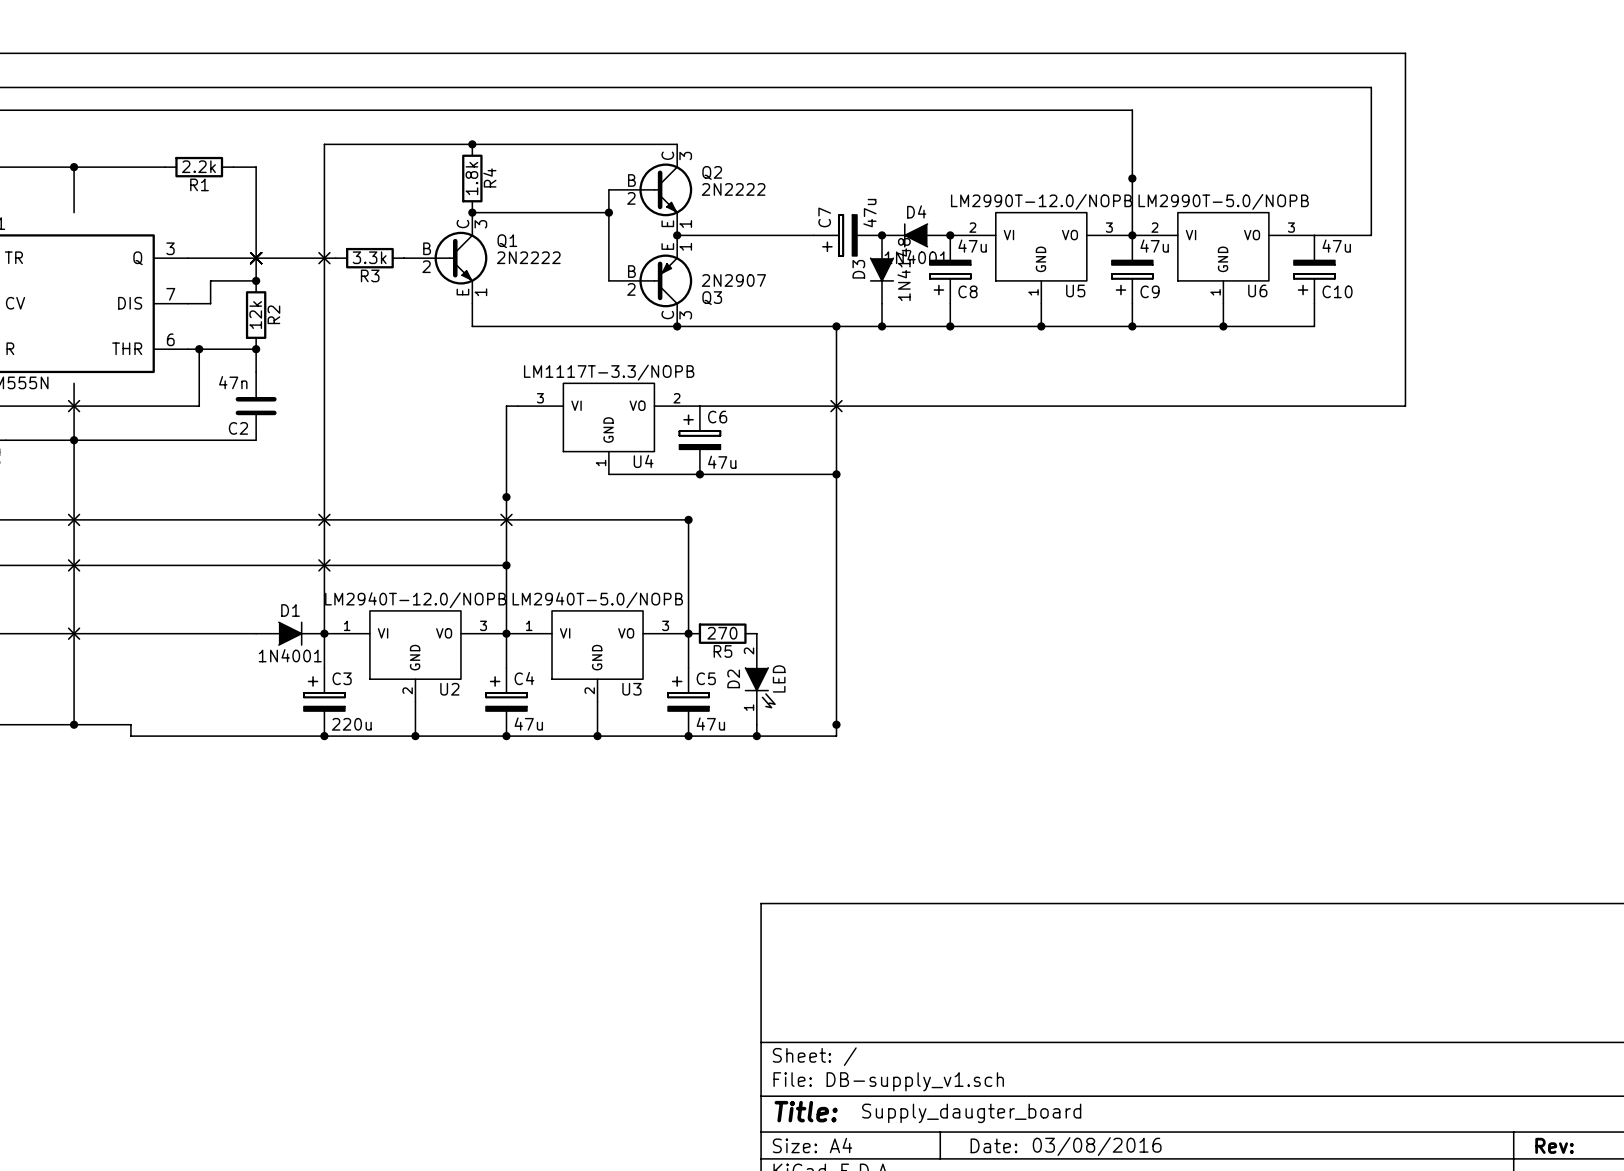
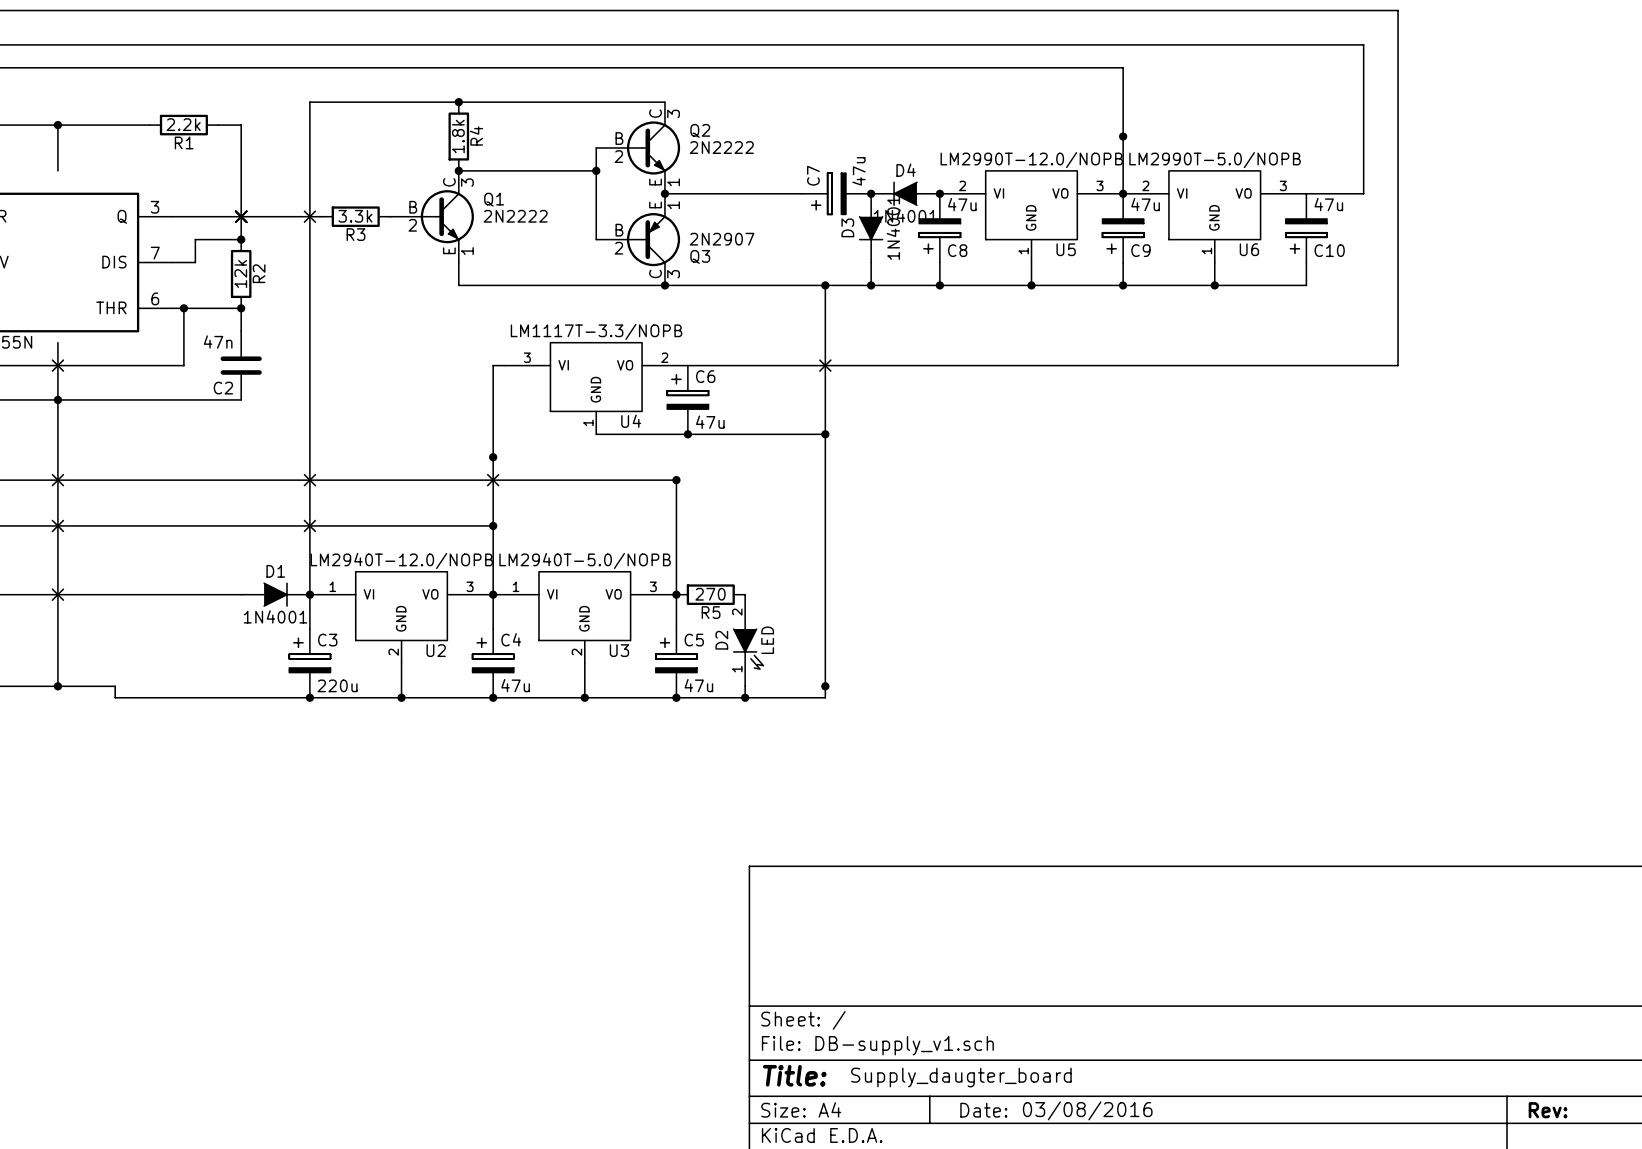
D3 value: 1N4148 (904, 269) -> 1N4001 (893, 228)

